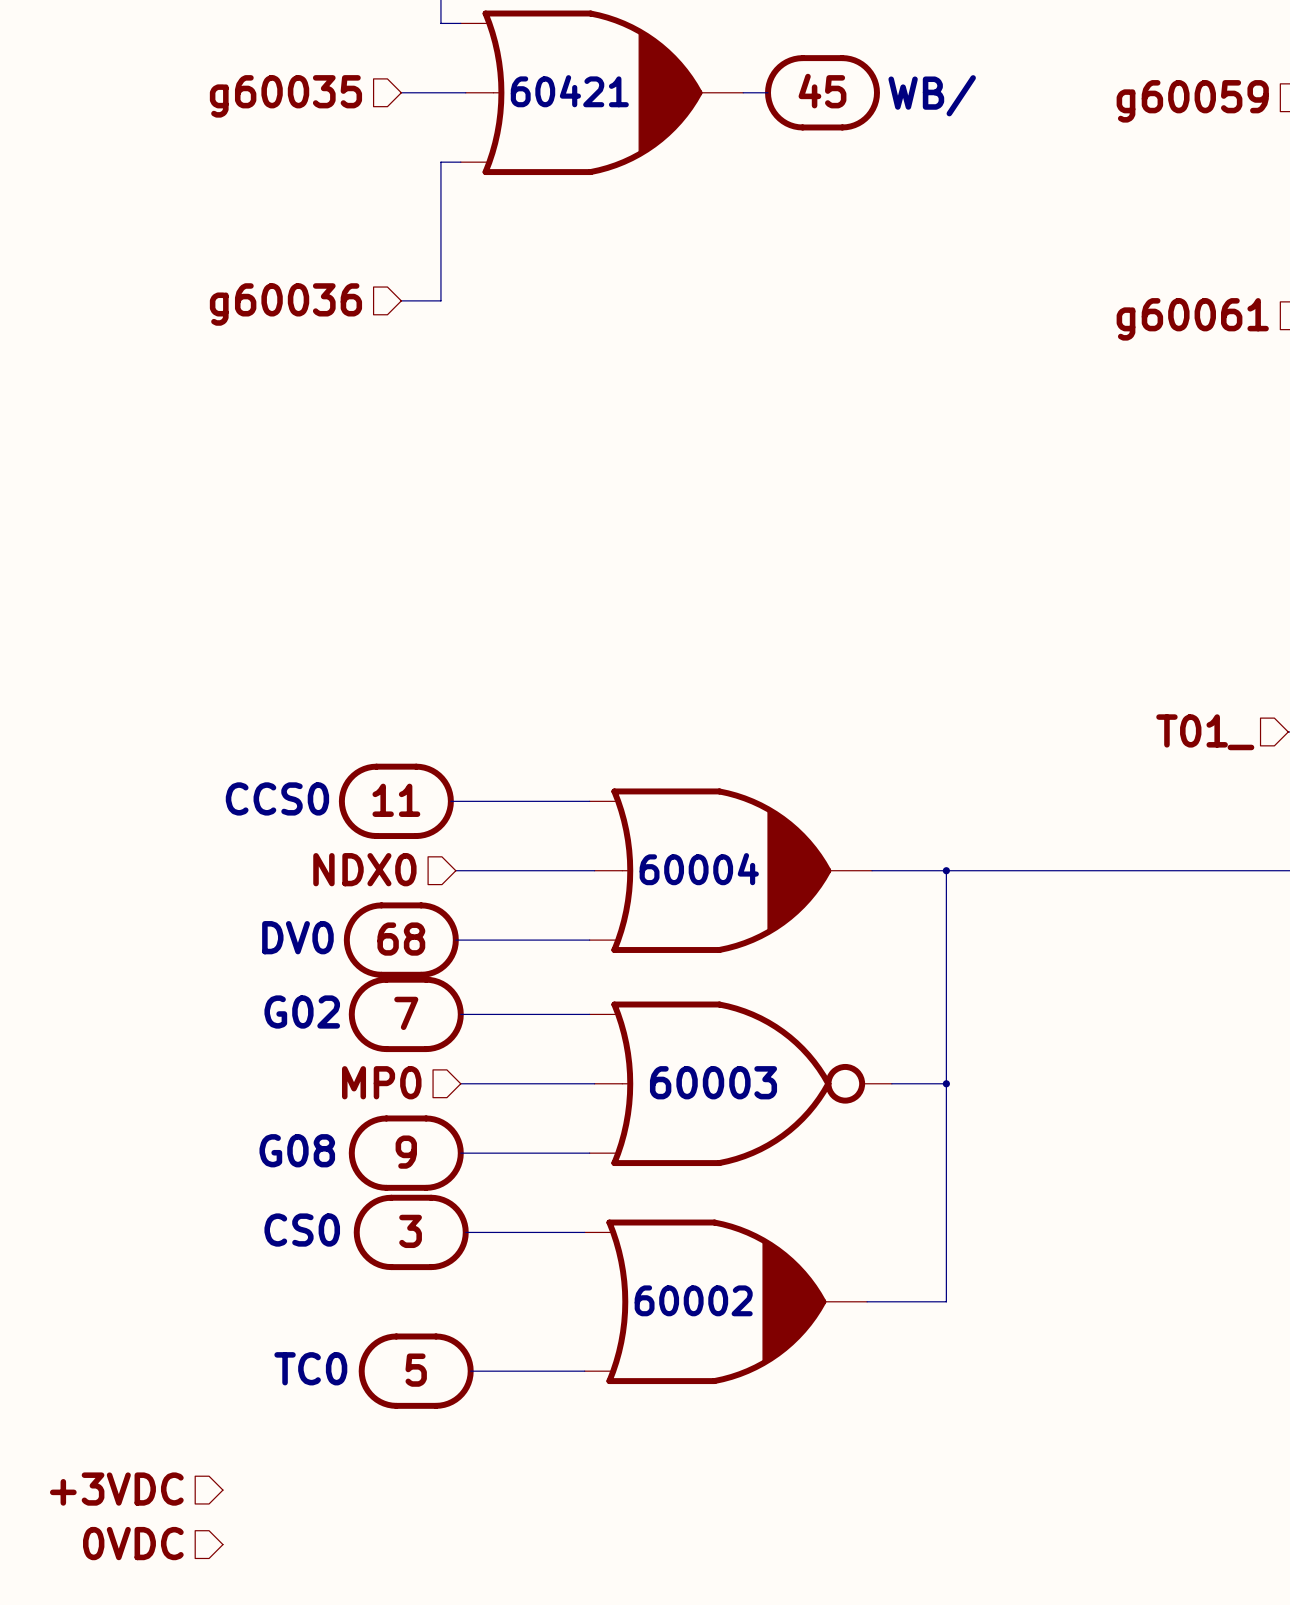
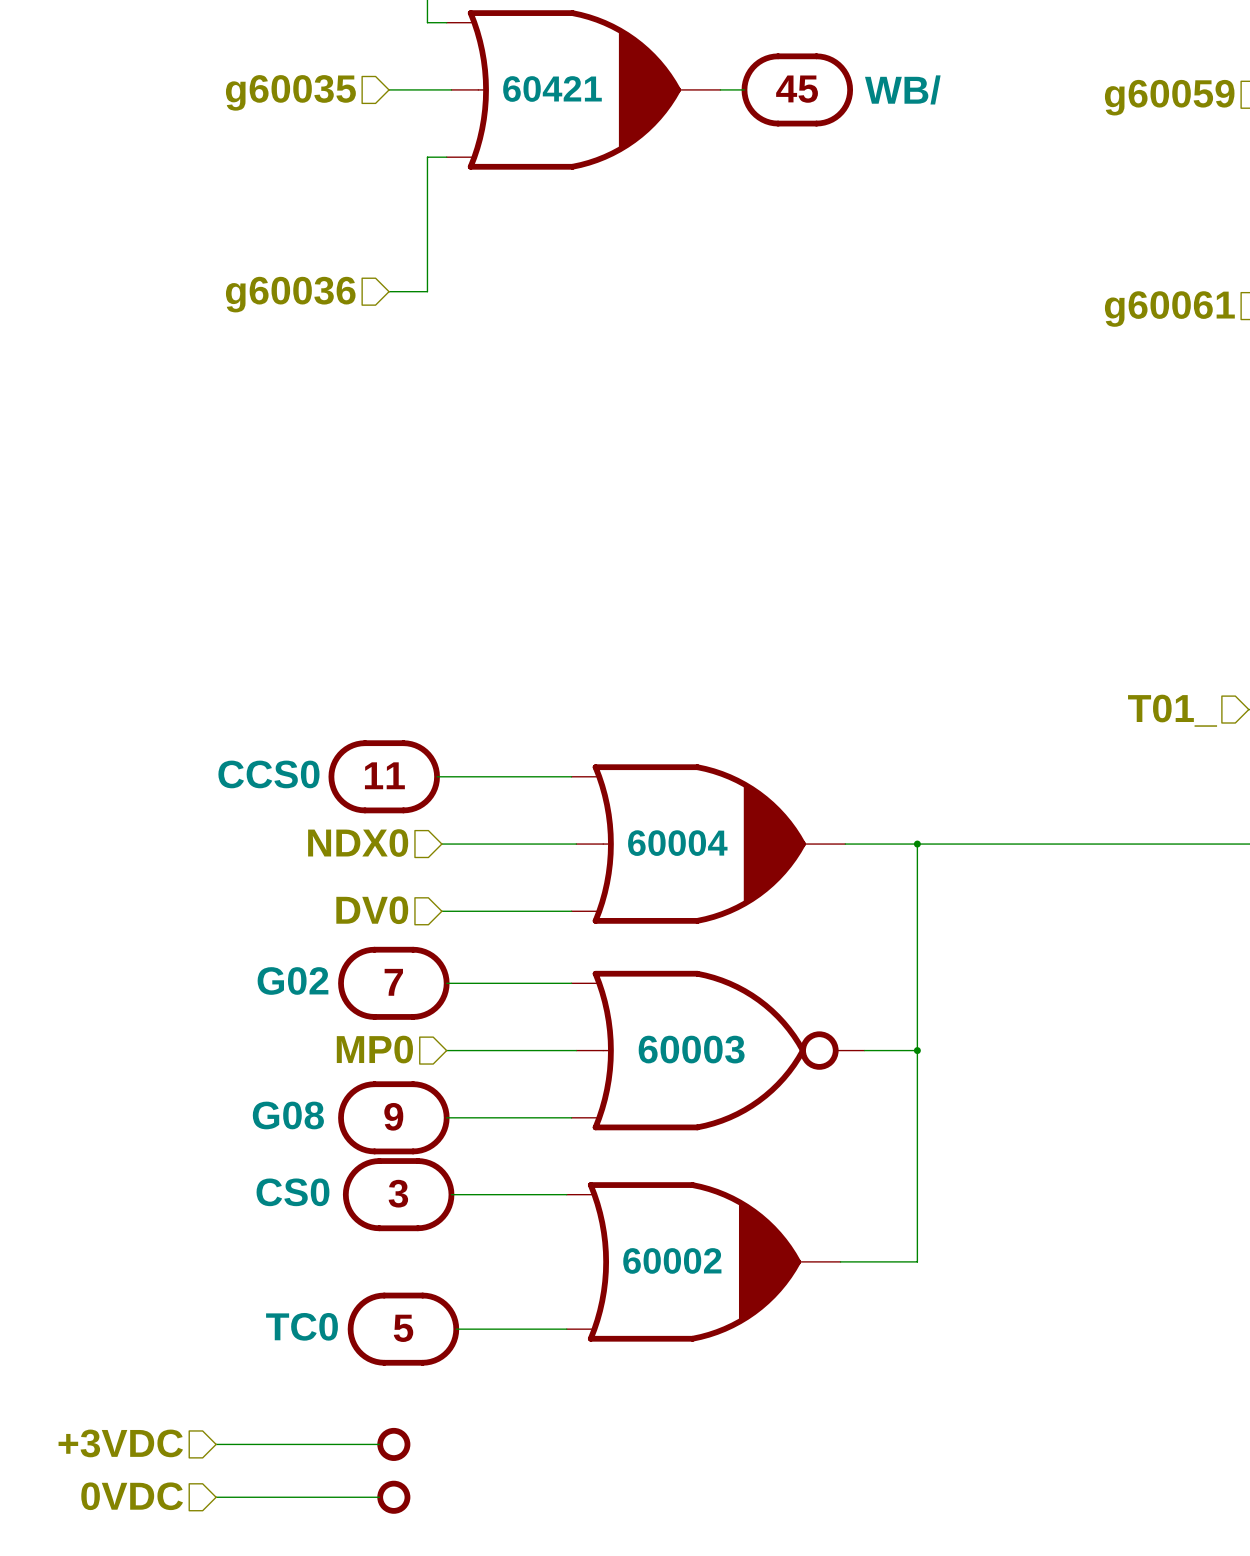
hierarchical label: none -> DV0 (372, 910)
part: (401, 940) -> none
wire: none -> (216, 1444) (379, 1444)
part: none -> (393, 1444)
wire: none -> (216, 1497) (379, 1497)
part: none -> (393, 1497)

